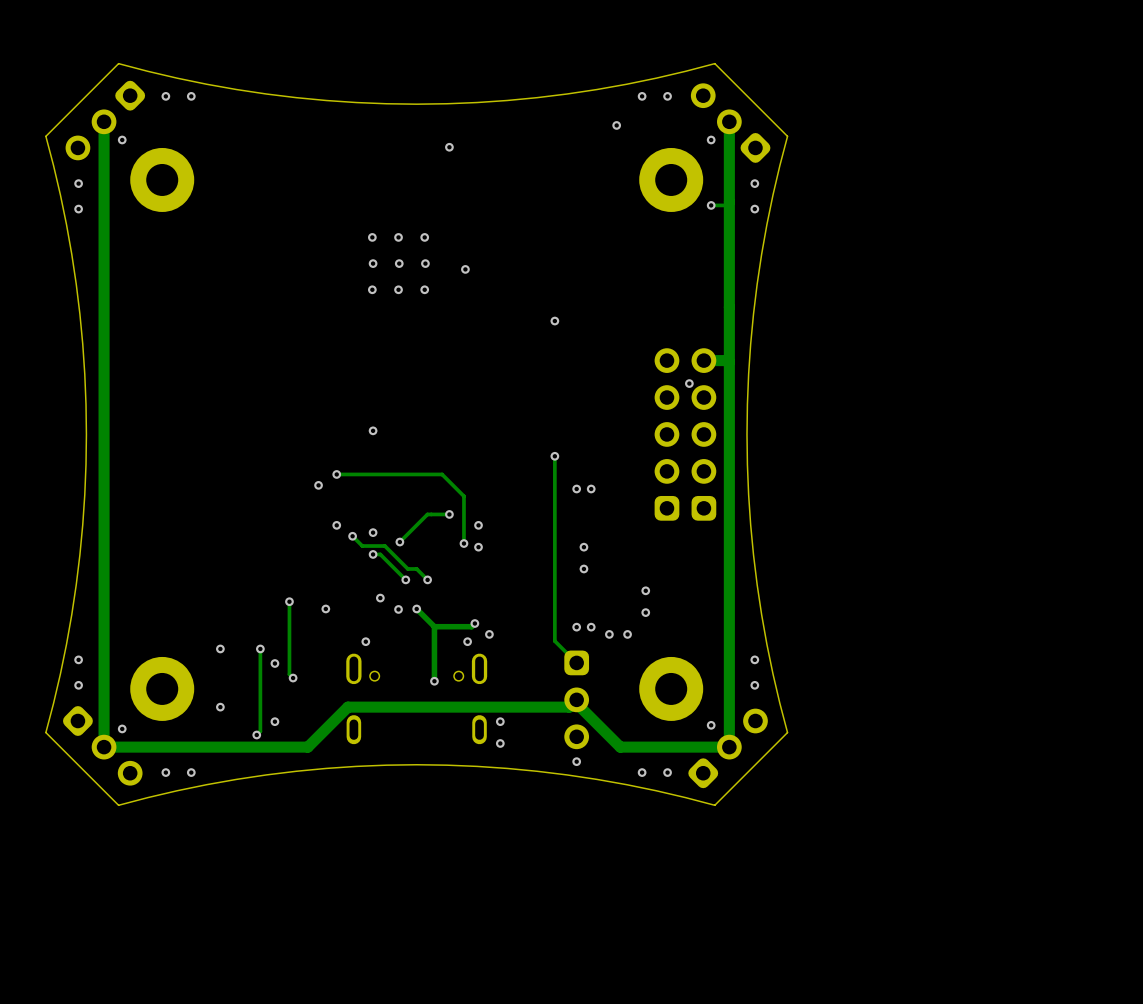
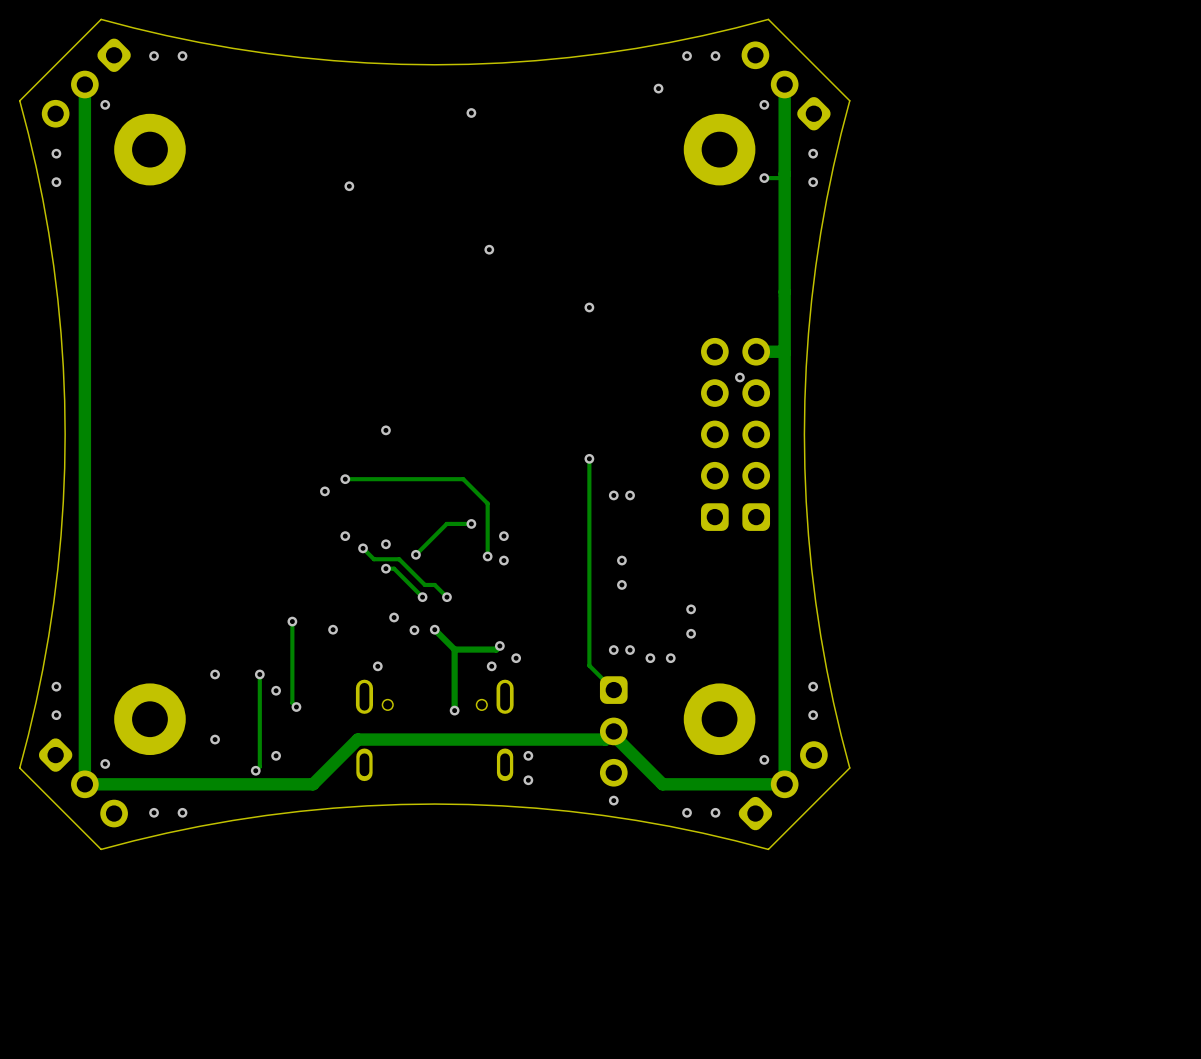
via: none -> (349, 186)
via: (372, 237) -> none
via: (398, 237) -> none
via: (424, 237) -> none
via: (373, 263) -> none
via: (399, 263) -> none
via: (425, 263) -> none
via: (372, 289) -> none
via: (398, 289) -> none
via: (424, 289) -> none

